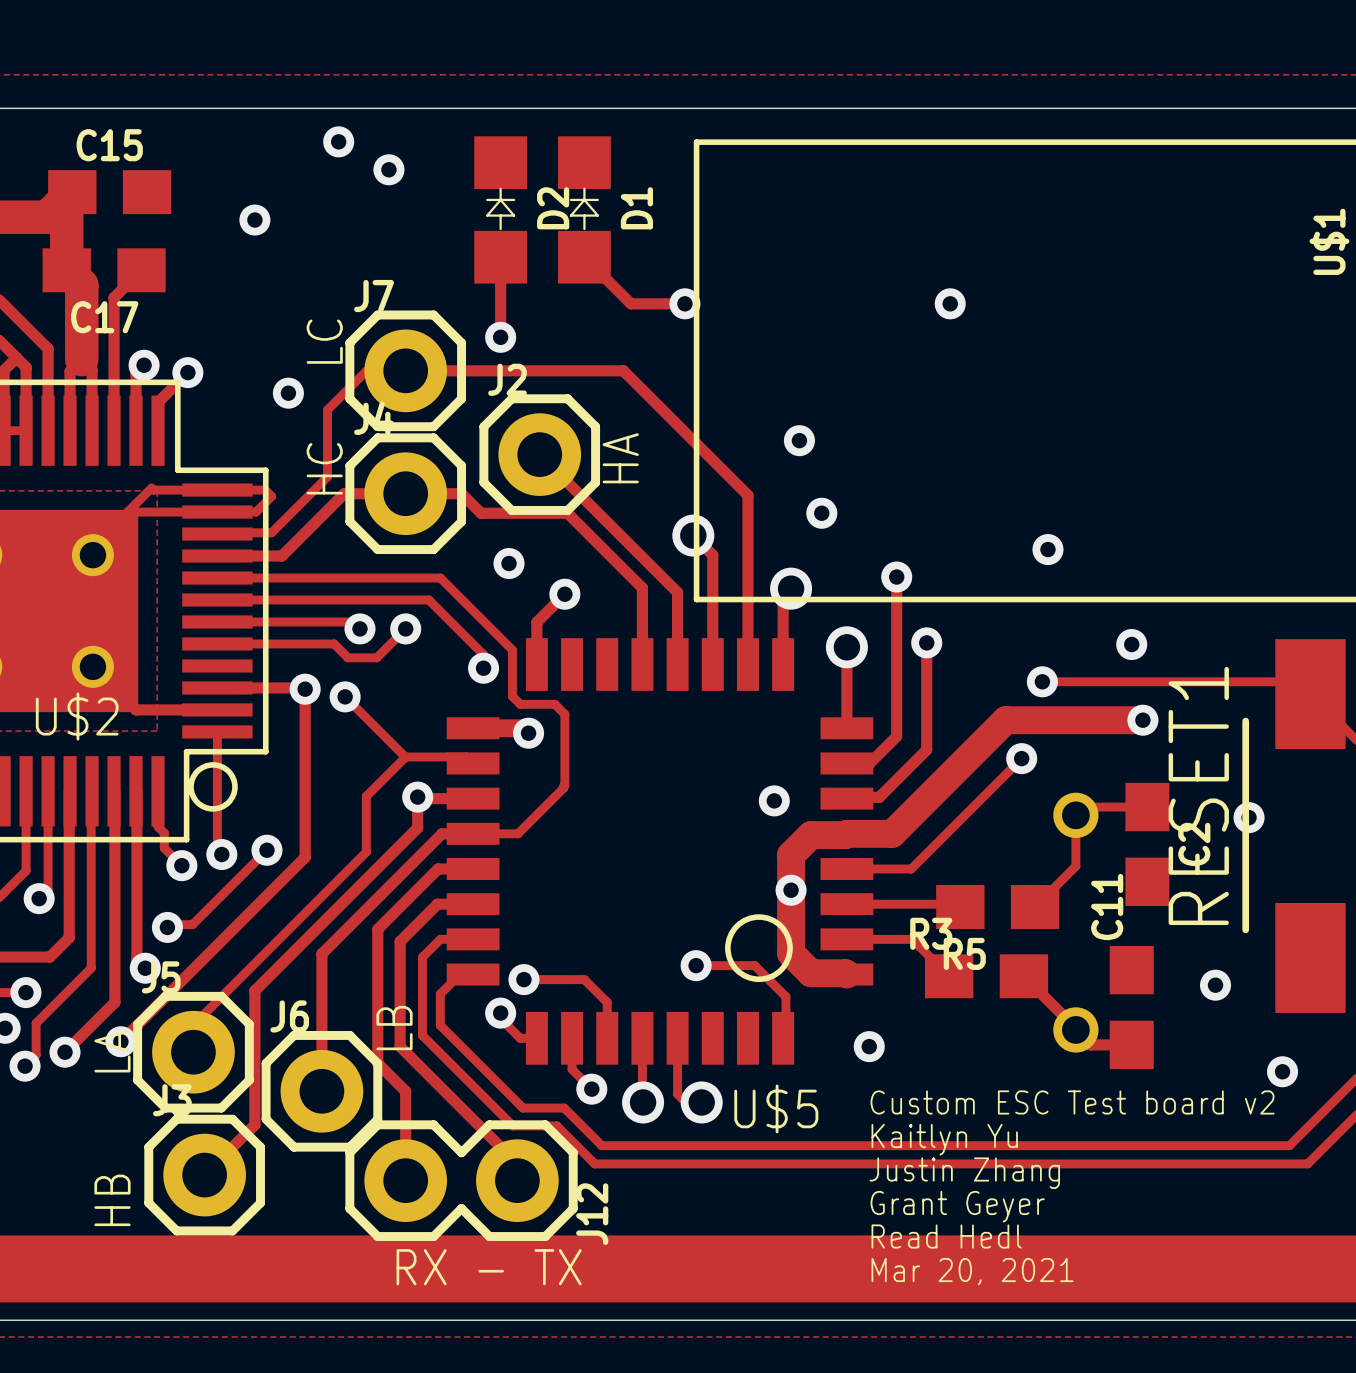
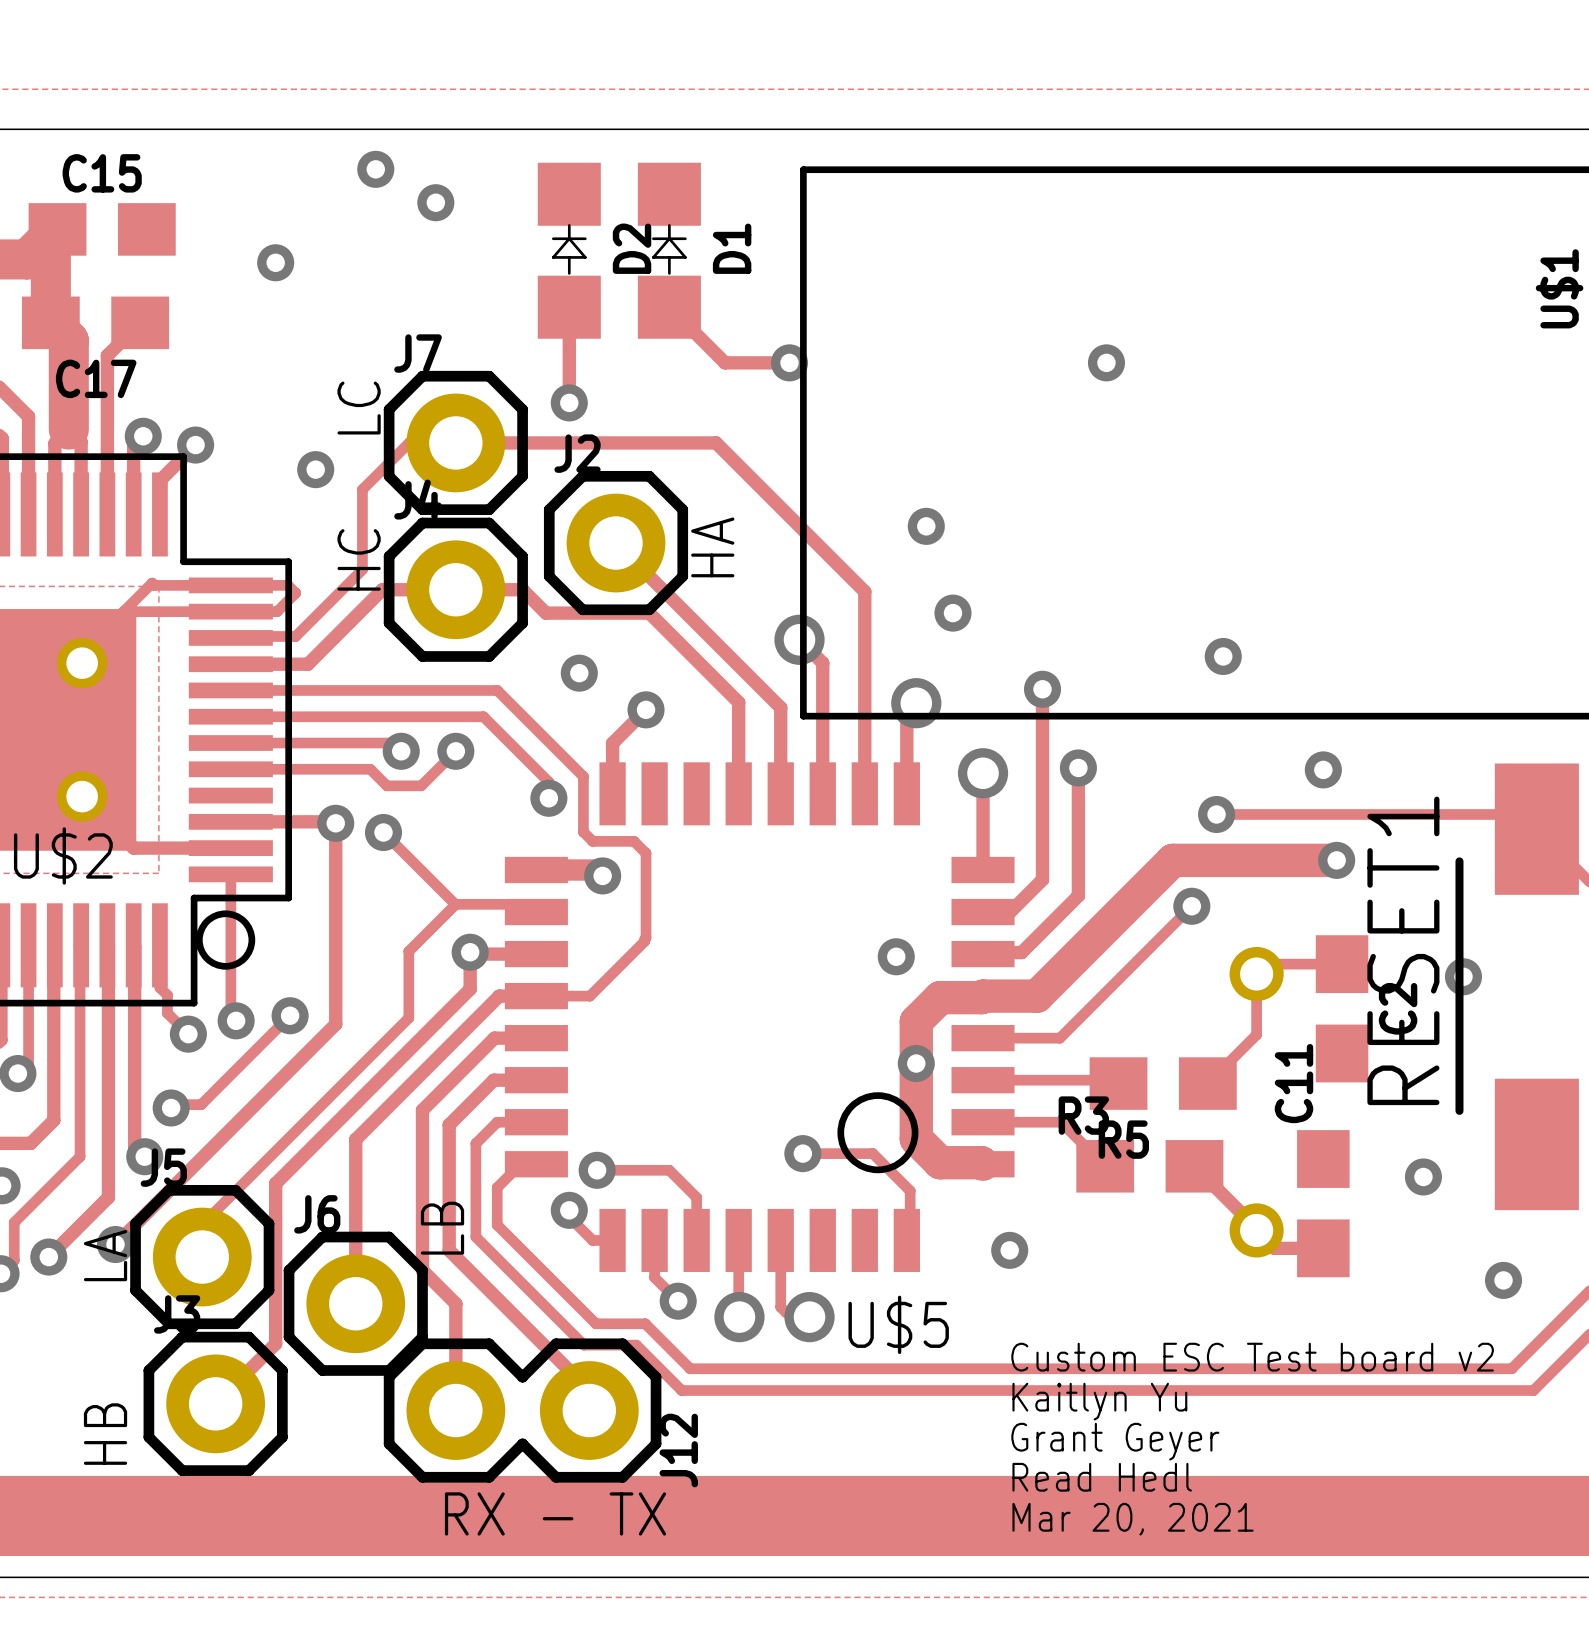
text position: Custom ESC Test board v2 (1072, 1102) -> Custom ESC Test board v2 (1252, 1357)
text position: Kaitlyn Yu (944, 1139) -> Kaitlyn Yu (1099, 1401)
text: Justin Zhang (964, 1173) -> none

